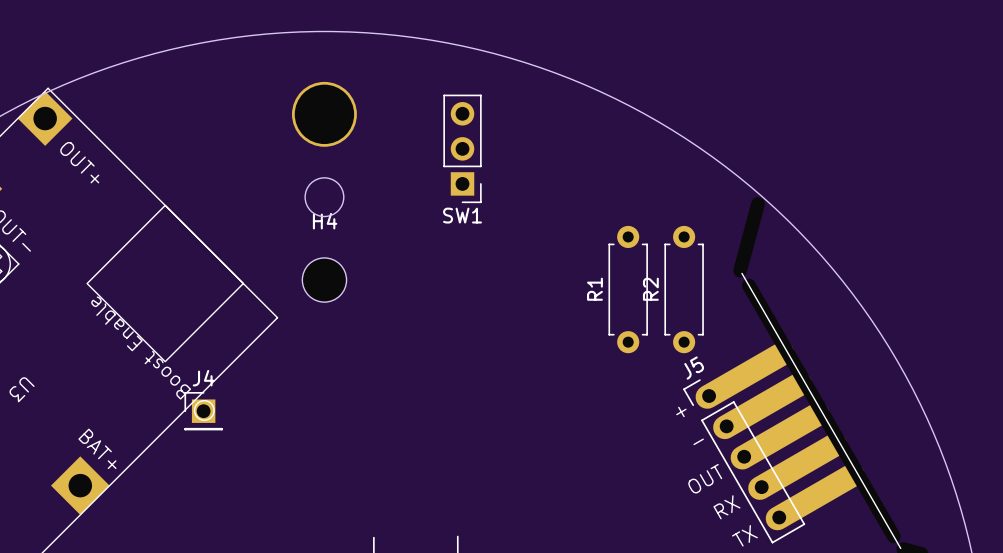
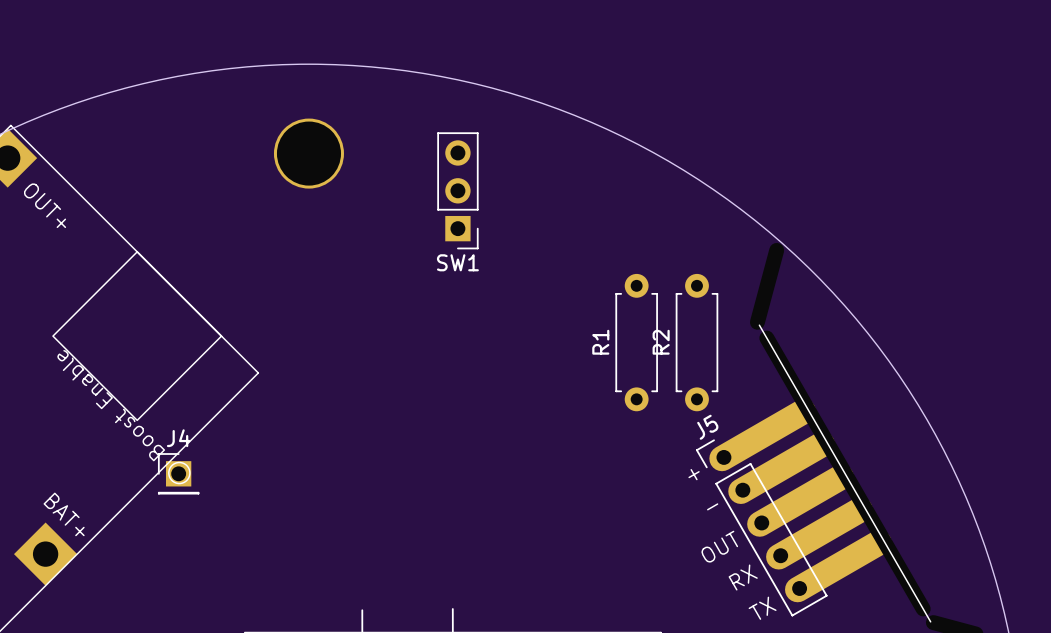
part: (324, 149) -> none
H4: (324, 280) -> none

